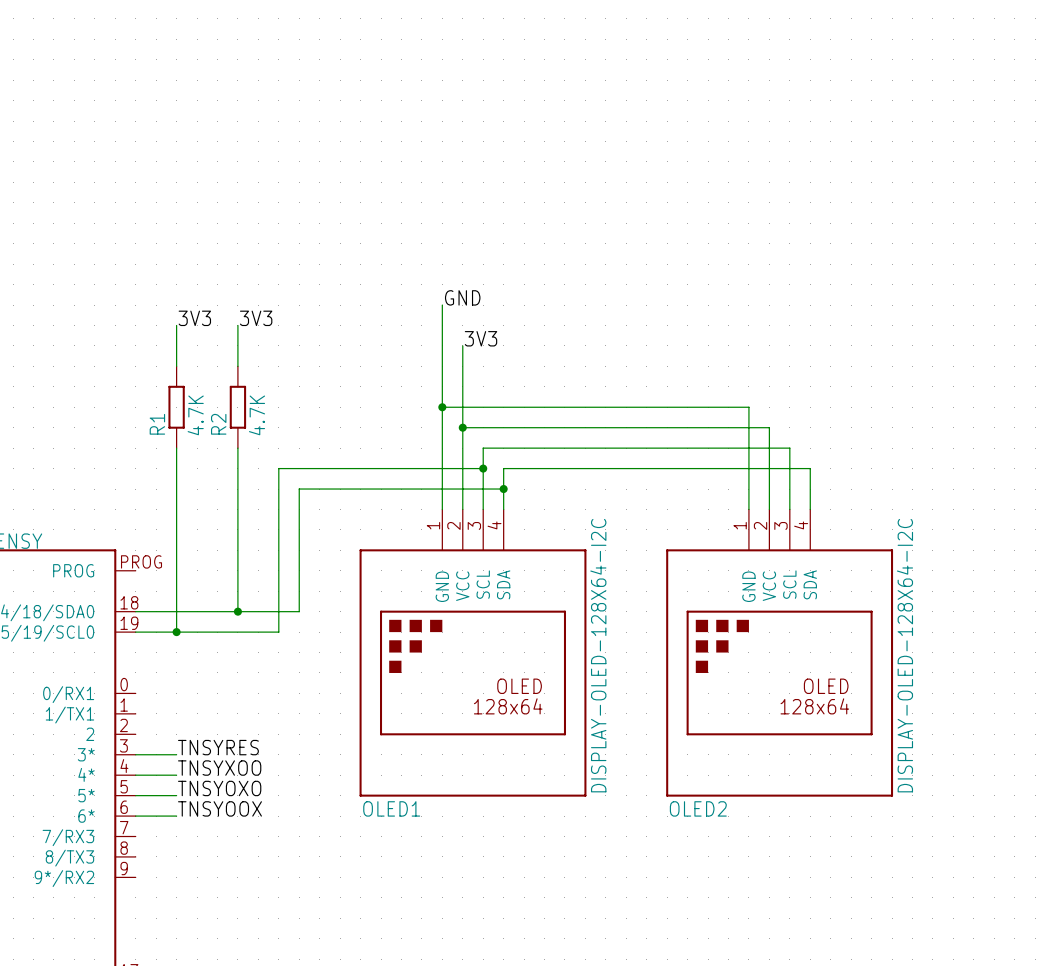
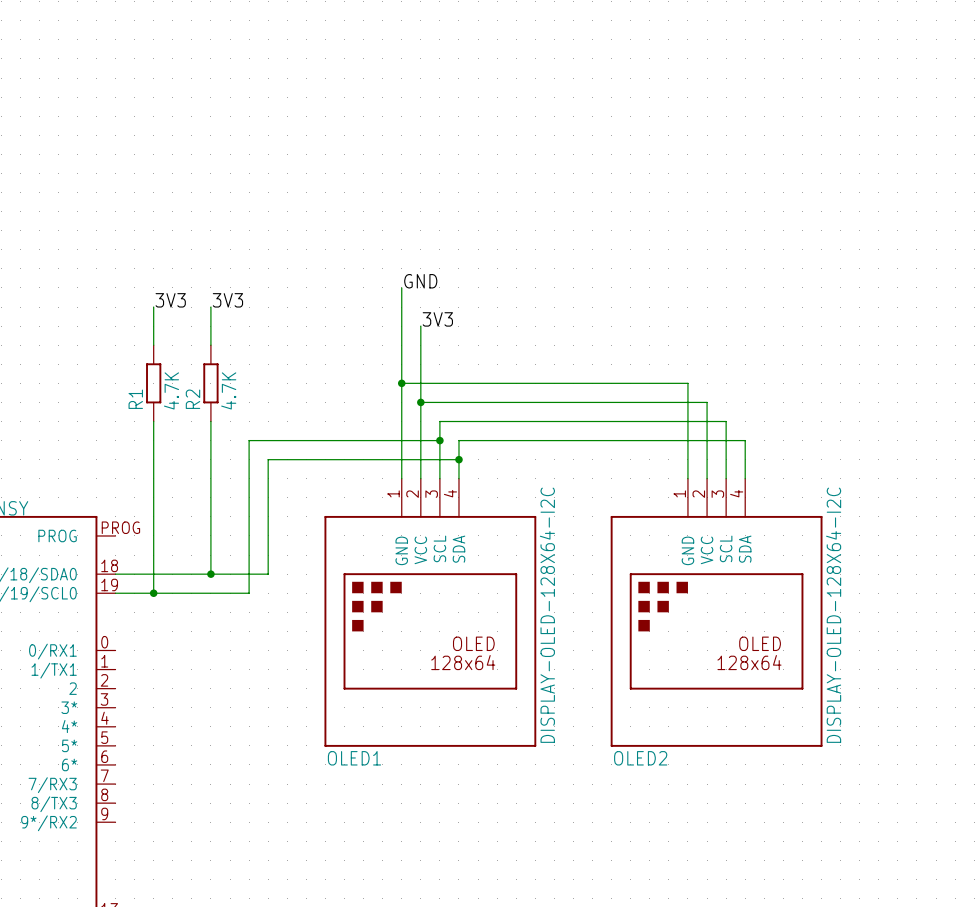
label: TNSYRES (218, 747) -> none
wire: (135, 754) (176, 754) -> none
label: TNSYXOO (219, 768) -> none
wire: (135, 775) (176, 775) -> none
label: TNSYOXO (219, 788) -> none
wire: (135, 795) (176, 795) -> none
label: TNSYOOX (219, 808) -> none
wire: (135, 816) (176, 816) -> none

